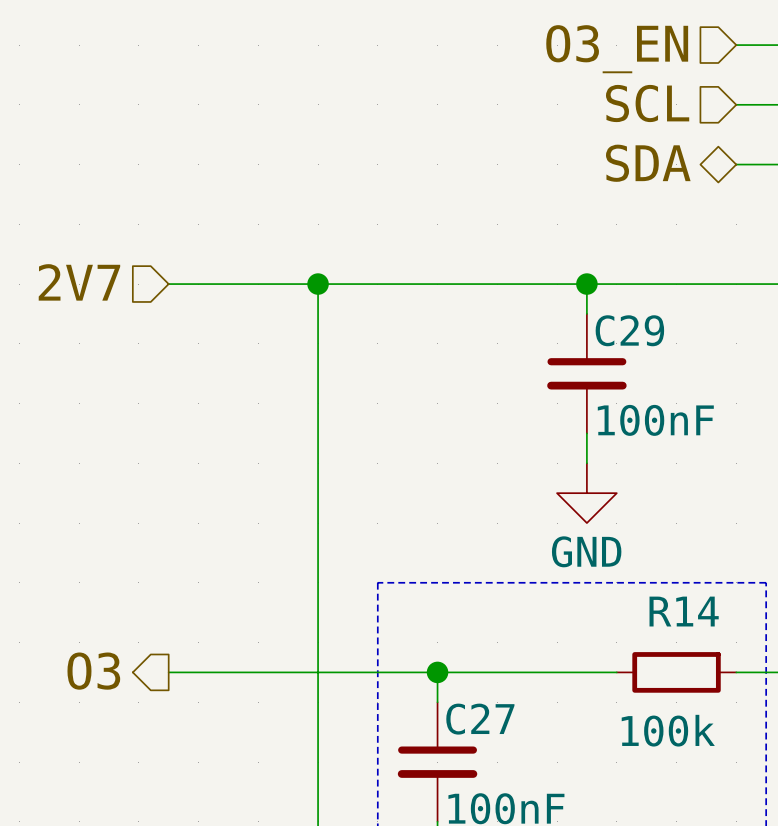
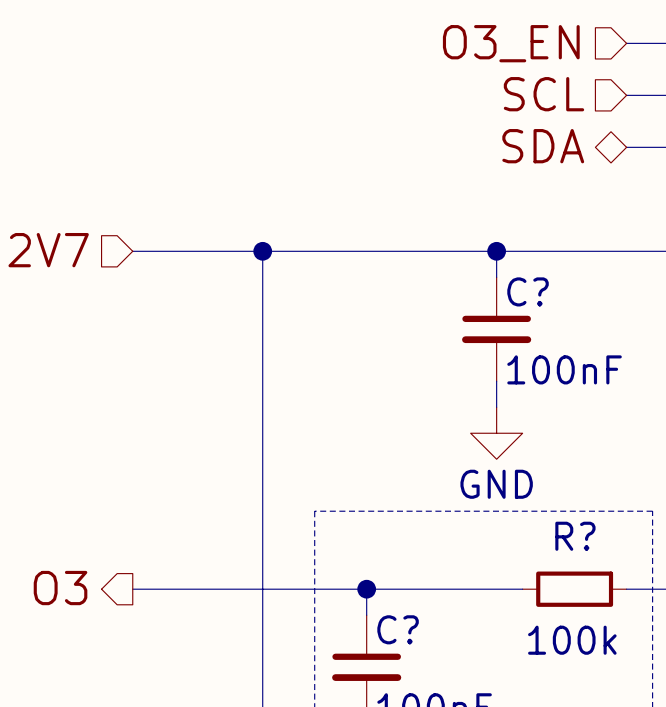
C29 name: C29 (629, 330) -> C? (528, 291)
R14 name: R14 (684, 611) -> R? (575, 536)
C27 name: C27 (480, 719) -> C? (398, 629)

